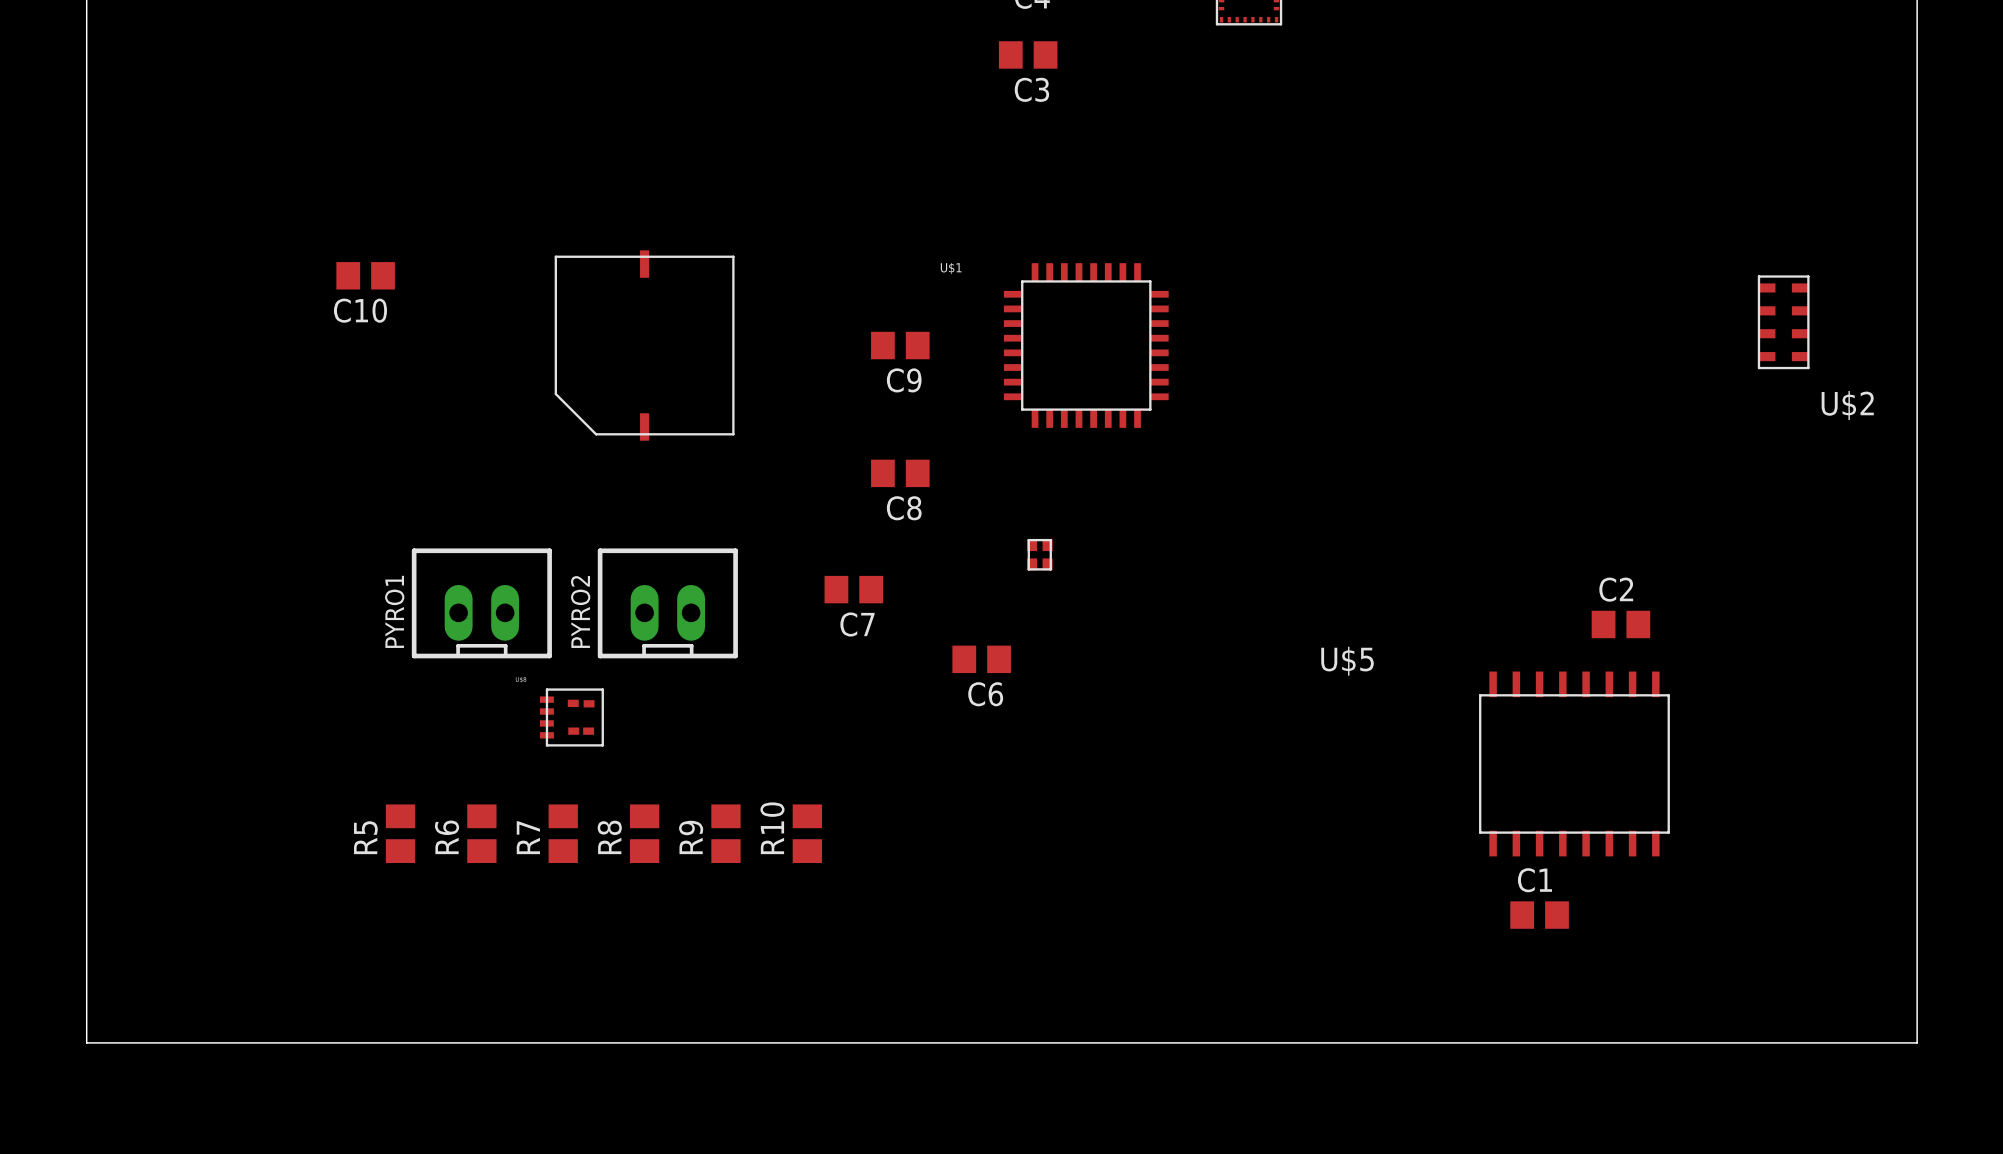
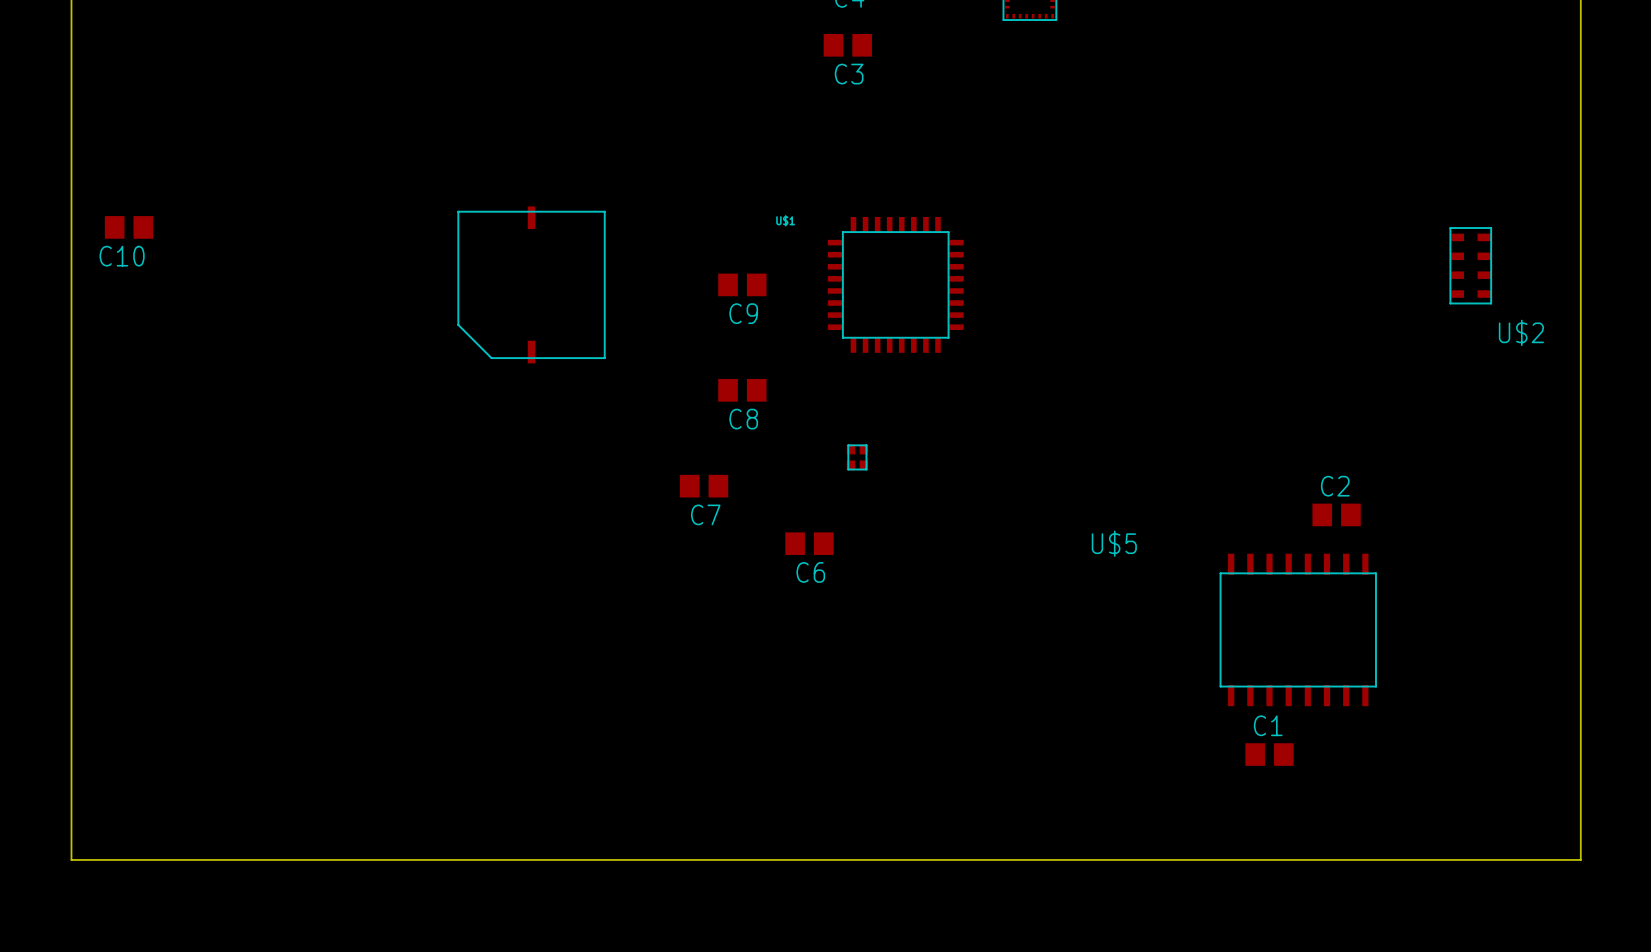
C10 position: (365, 275) -> (128, 227)
PYRO1: (481, 603) -> none
PYRO2: (667, 603) -> none
part: (571, 717) -> none
R5: (400, 833) -> none
R6: (481, 833) -> none
R7: (563, 833) -> none
R8: (644, 833) -> none
R9: (725, 833) -> none
R10: (807, 833) -> none

